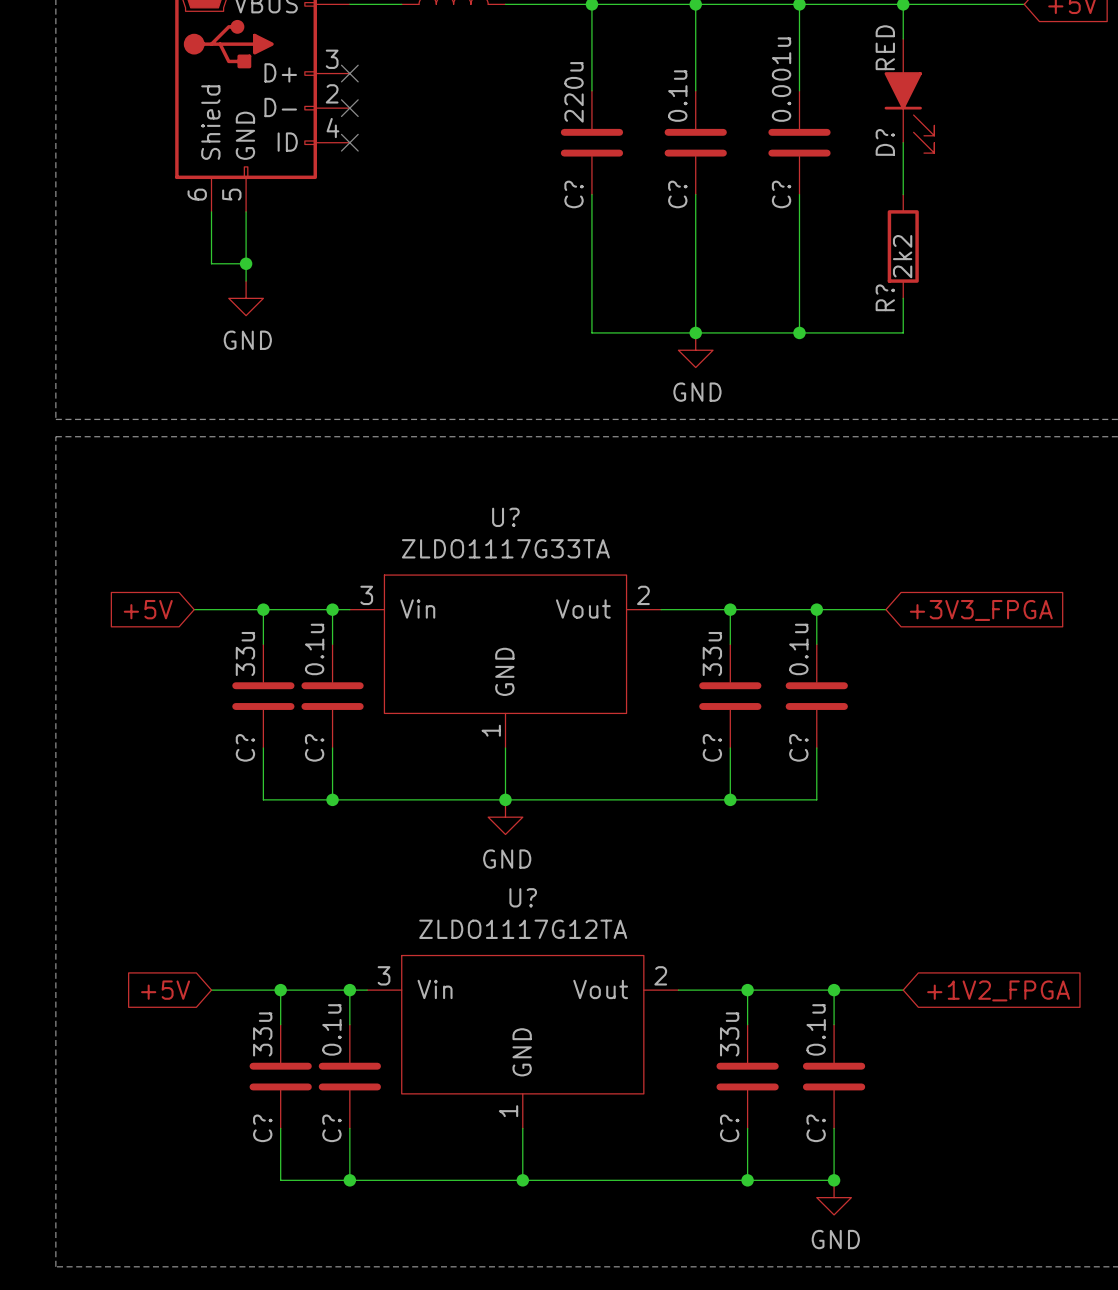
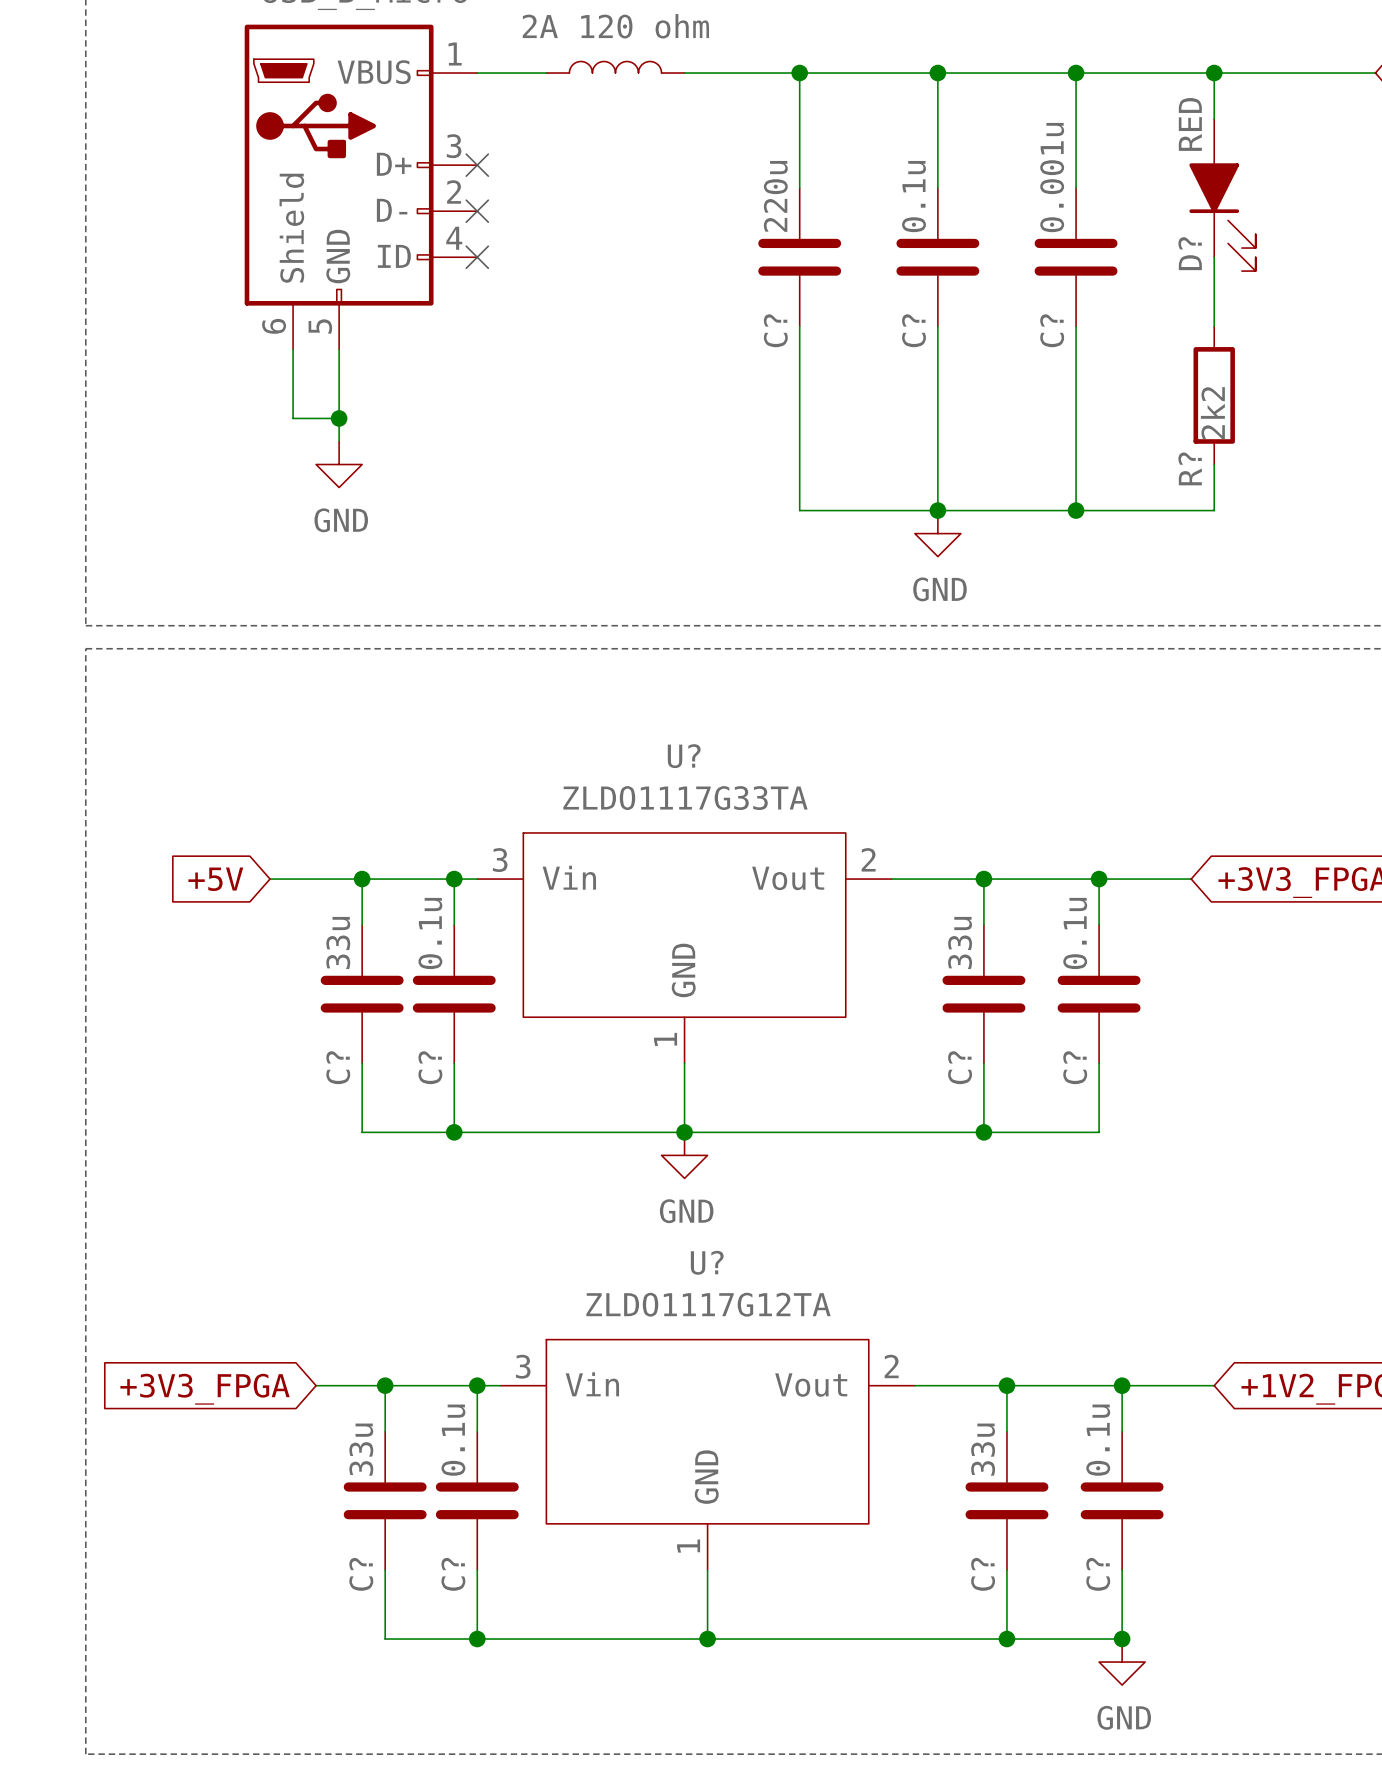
global label: none -> +3V3_FPGA (204, 1389)
global label: +5V (165, 990) -> none
wire: (211, 990) (228, 990) -> none

